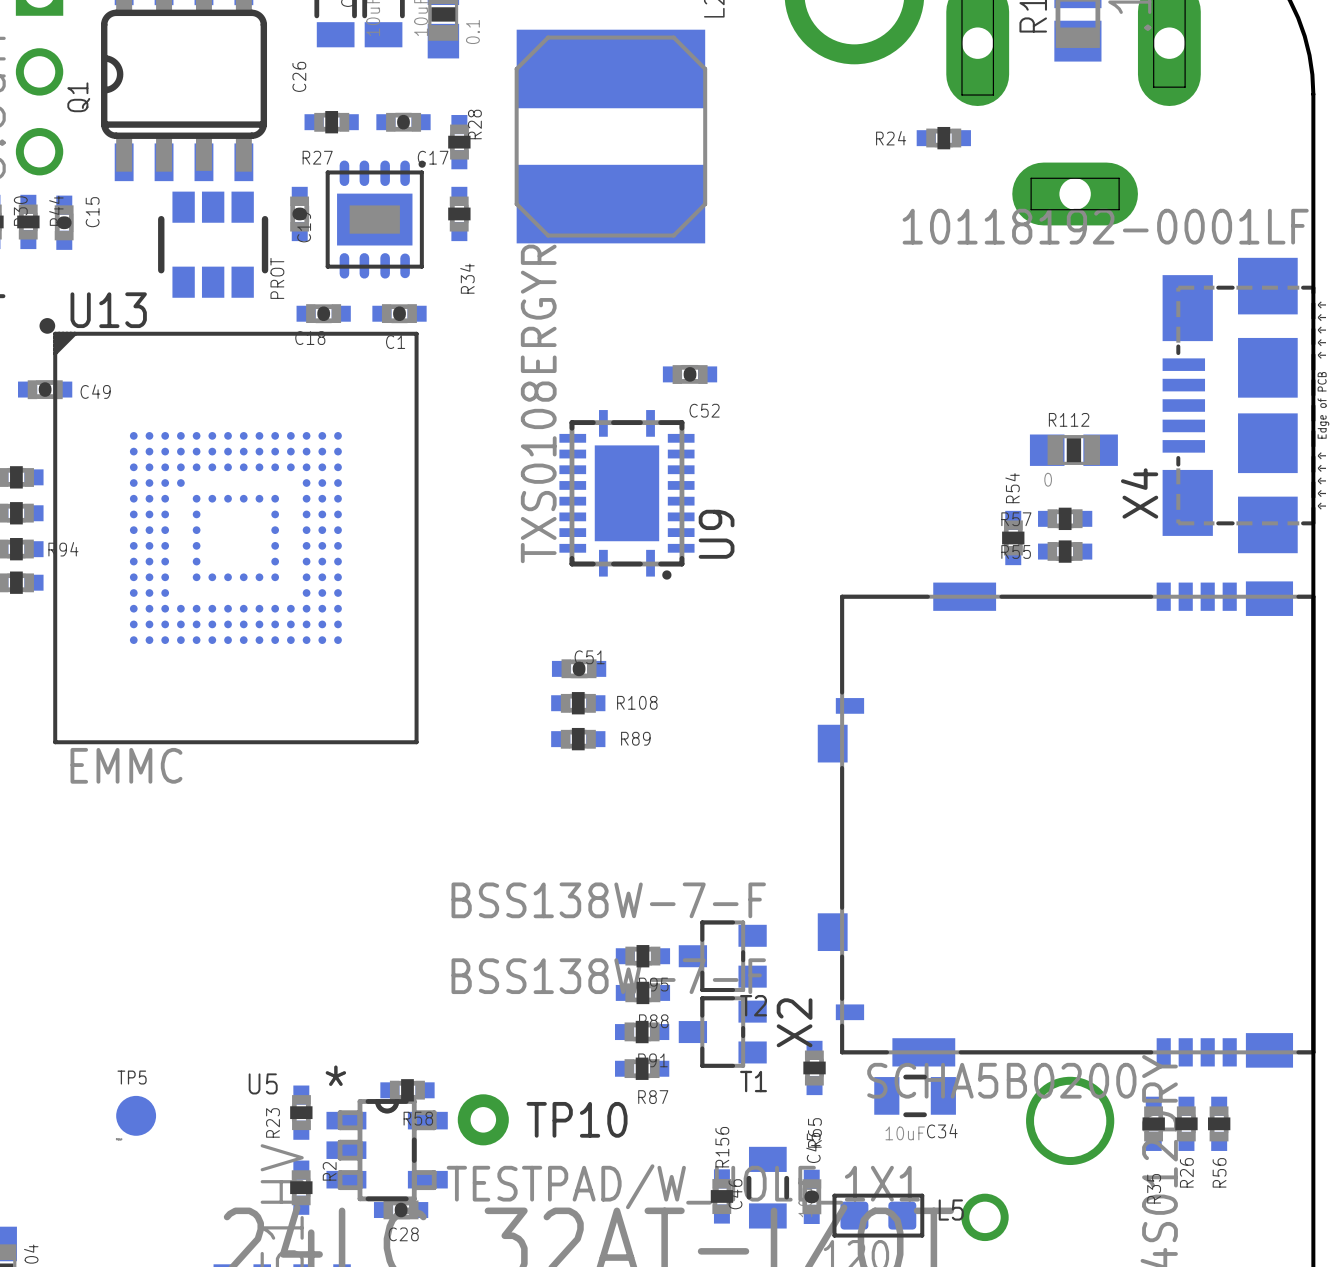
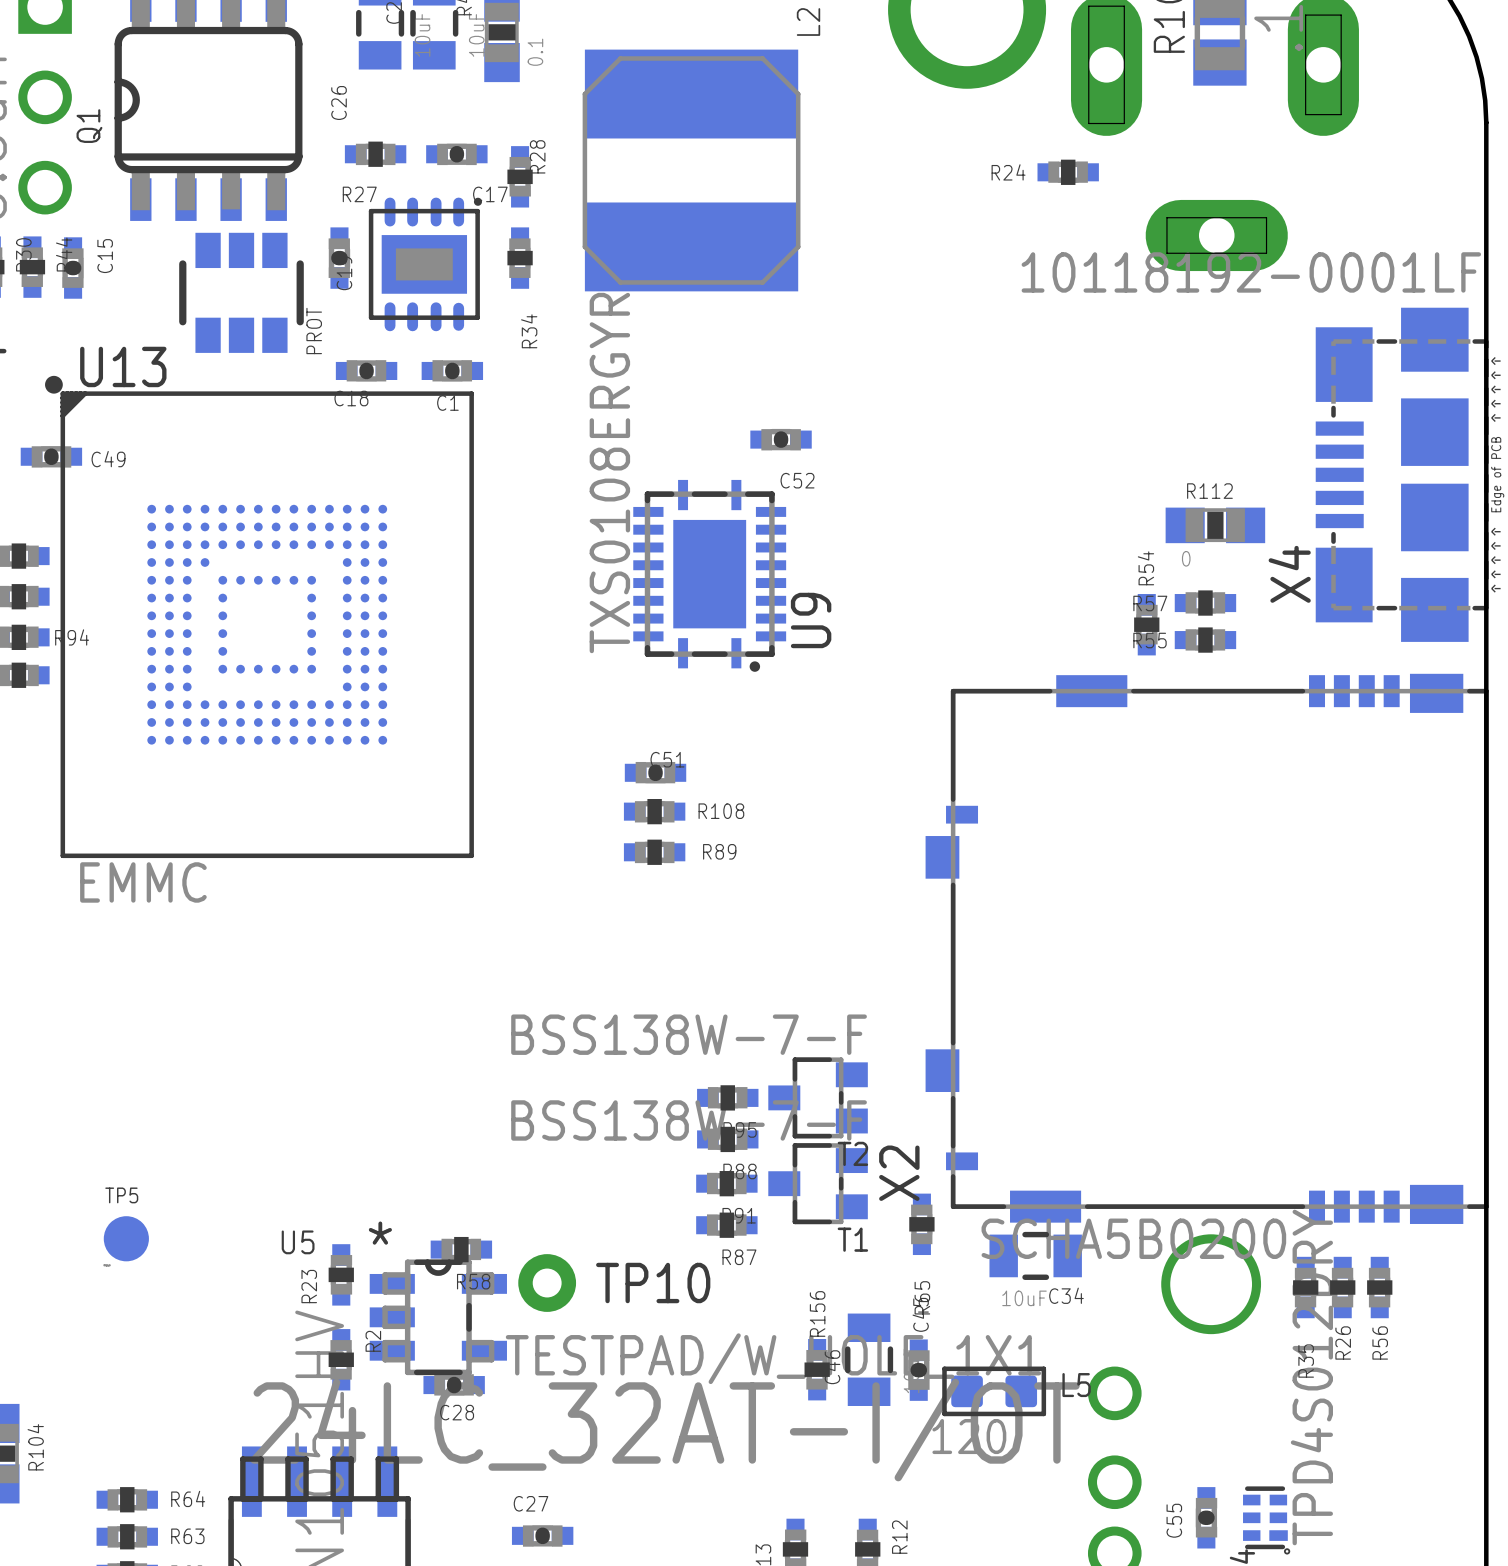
TP5 position: (136, 1115) -> (126, 1238)

